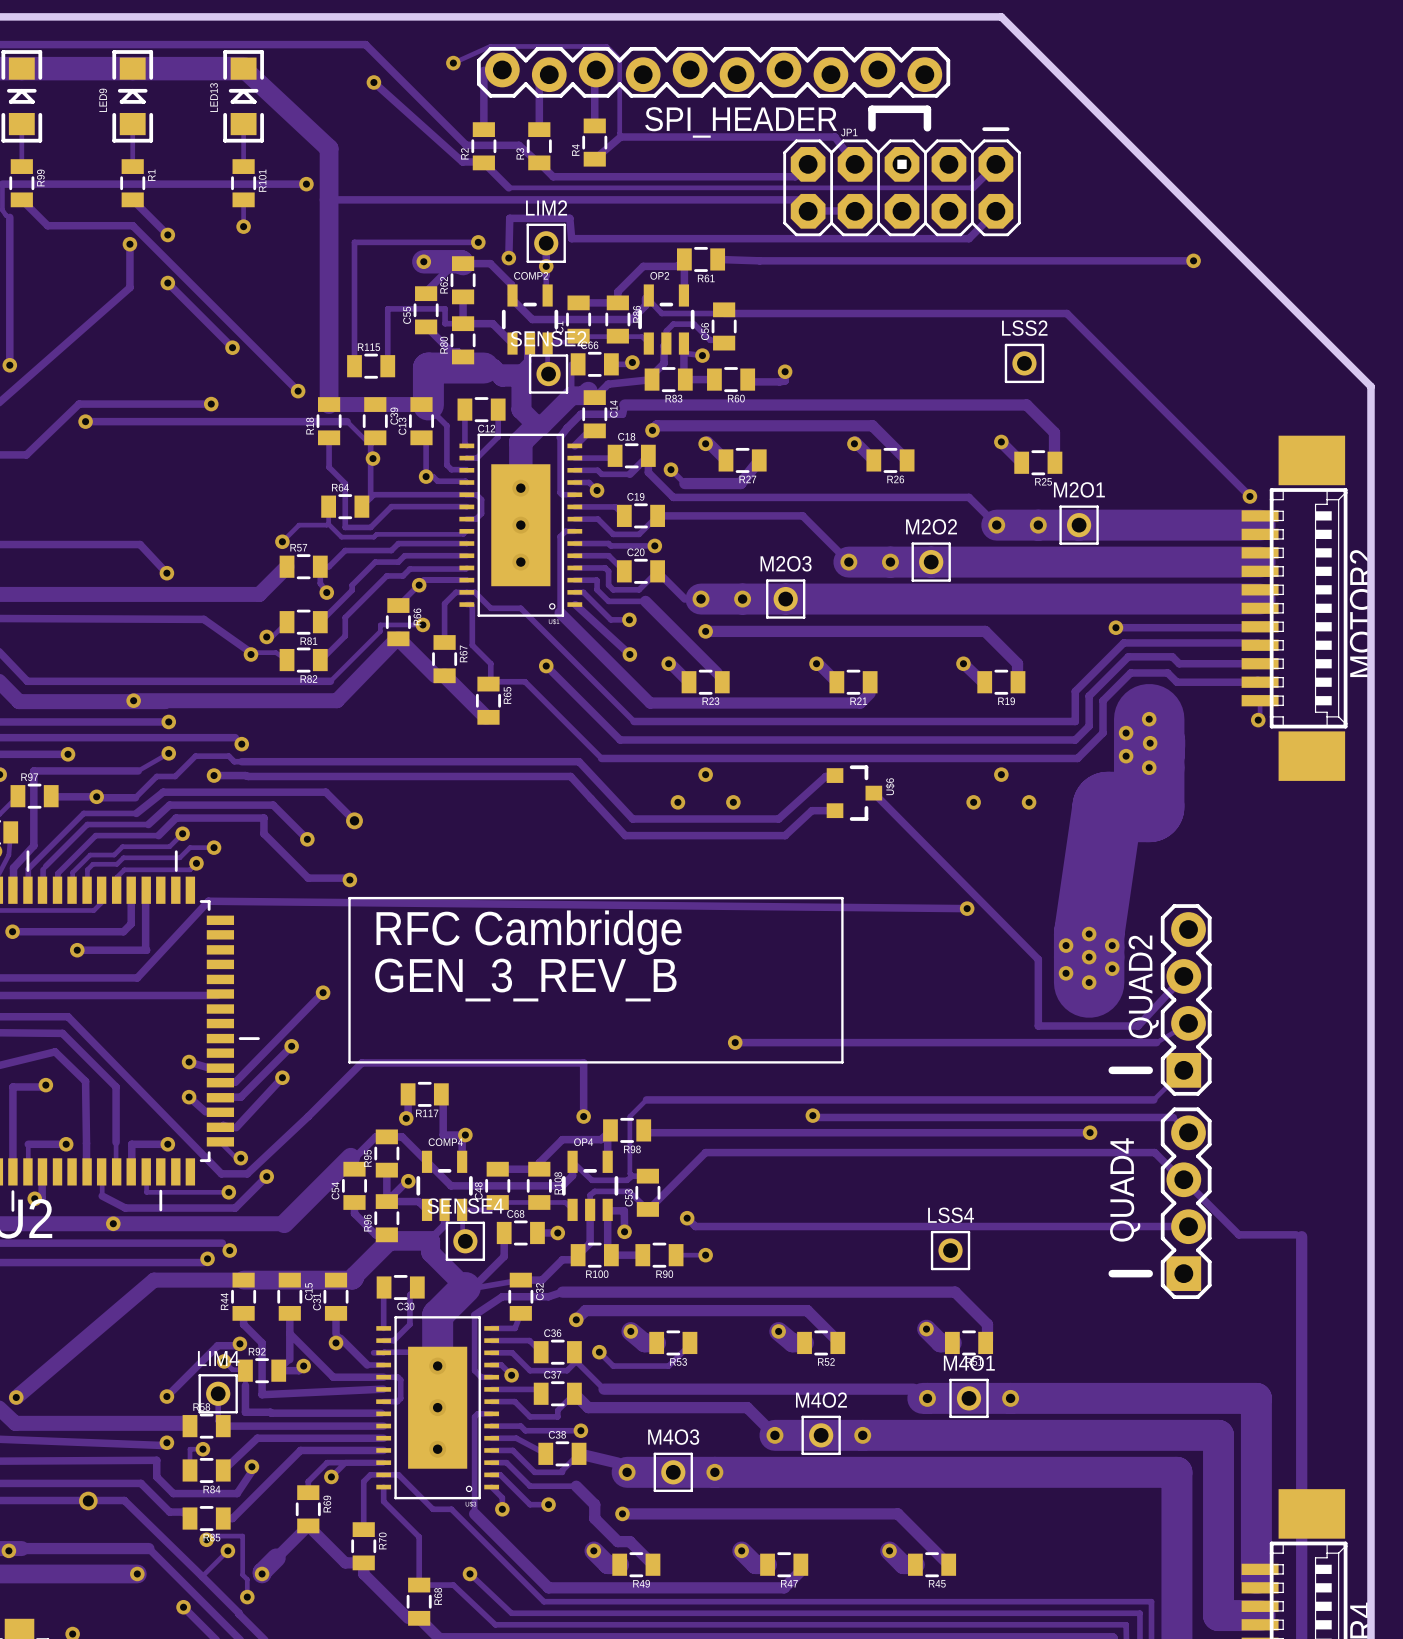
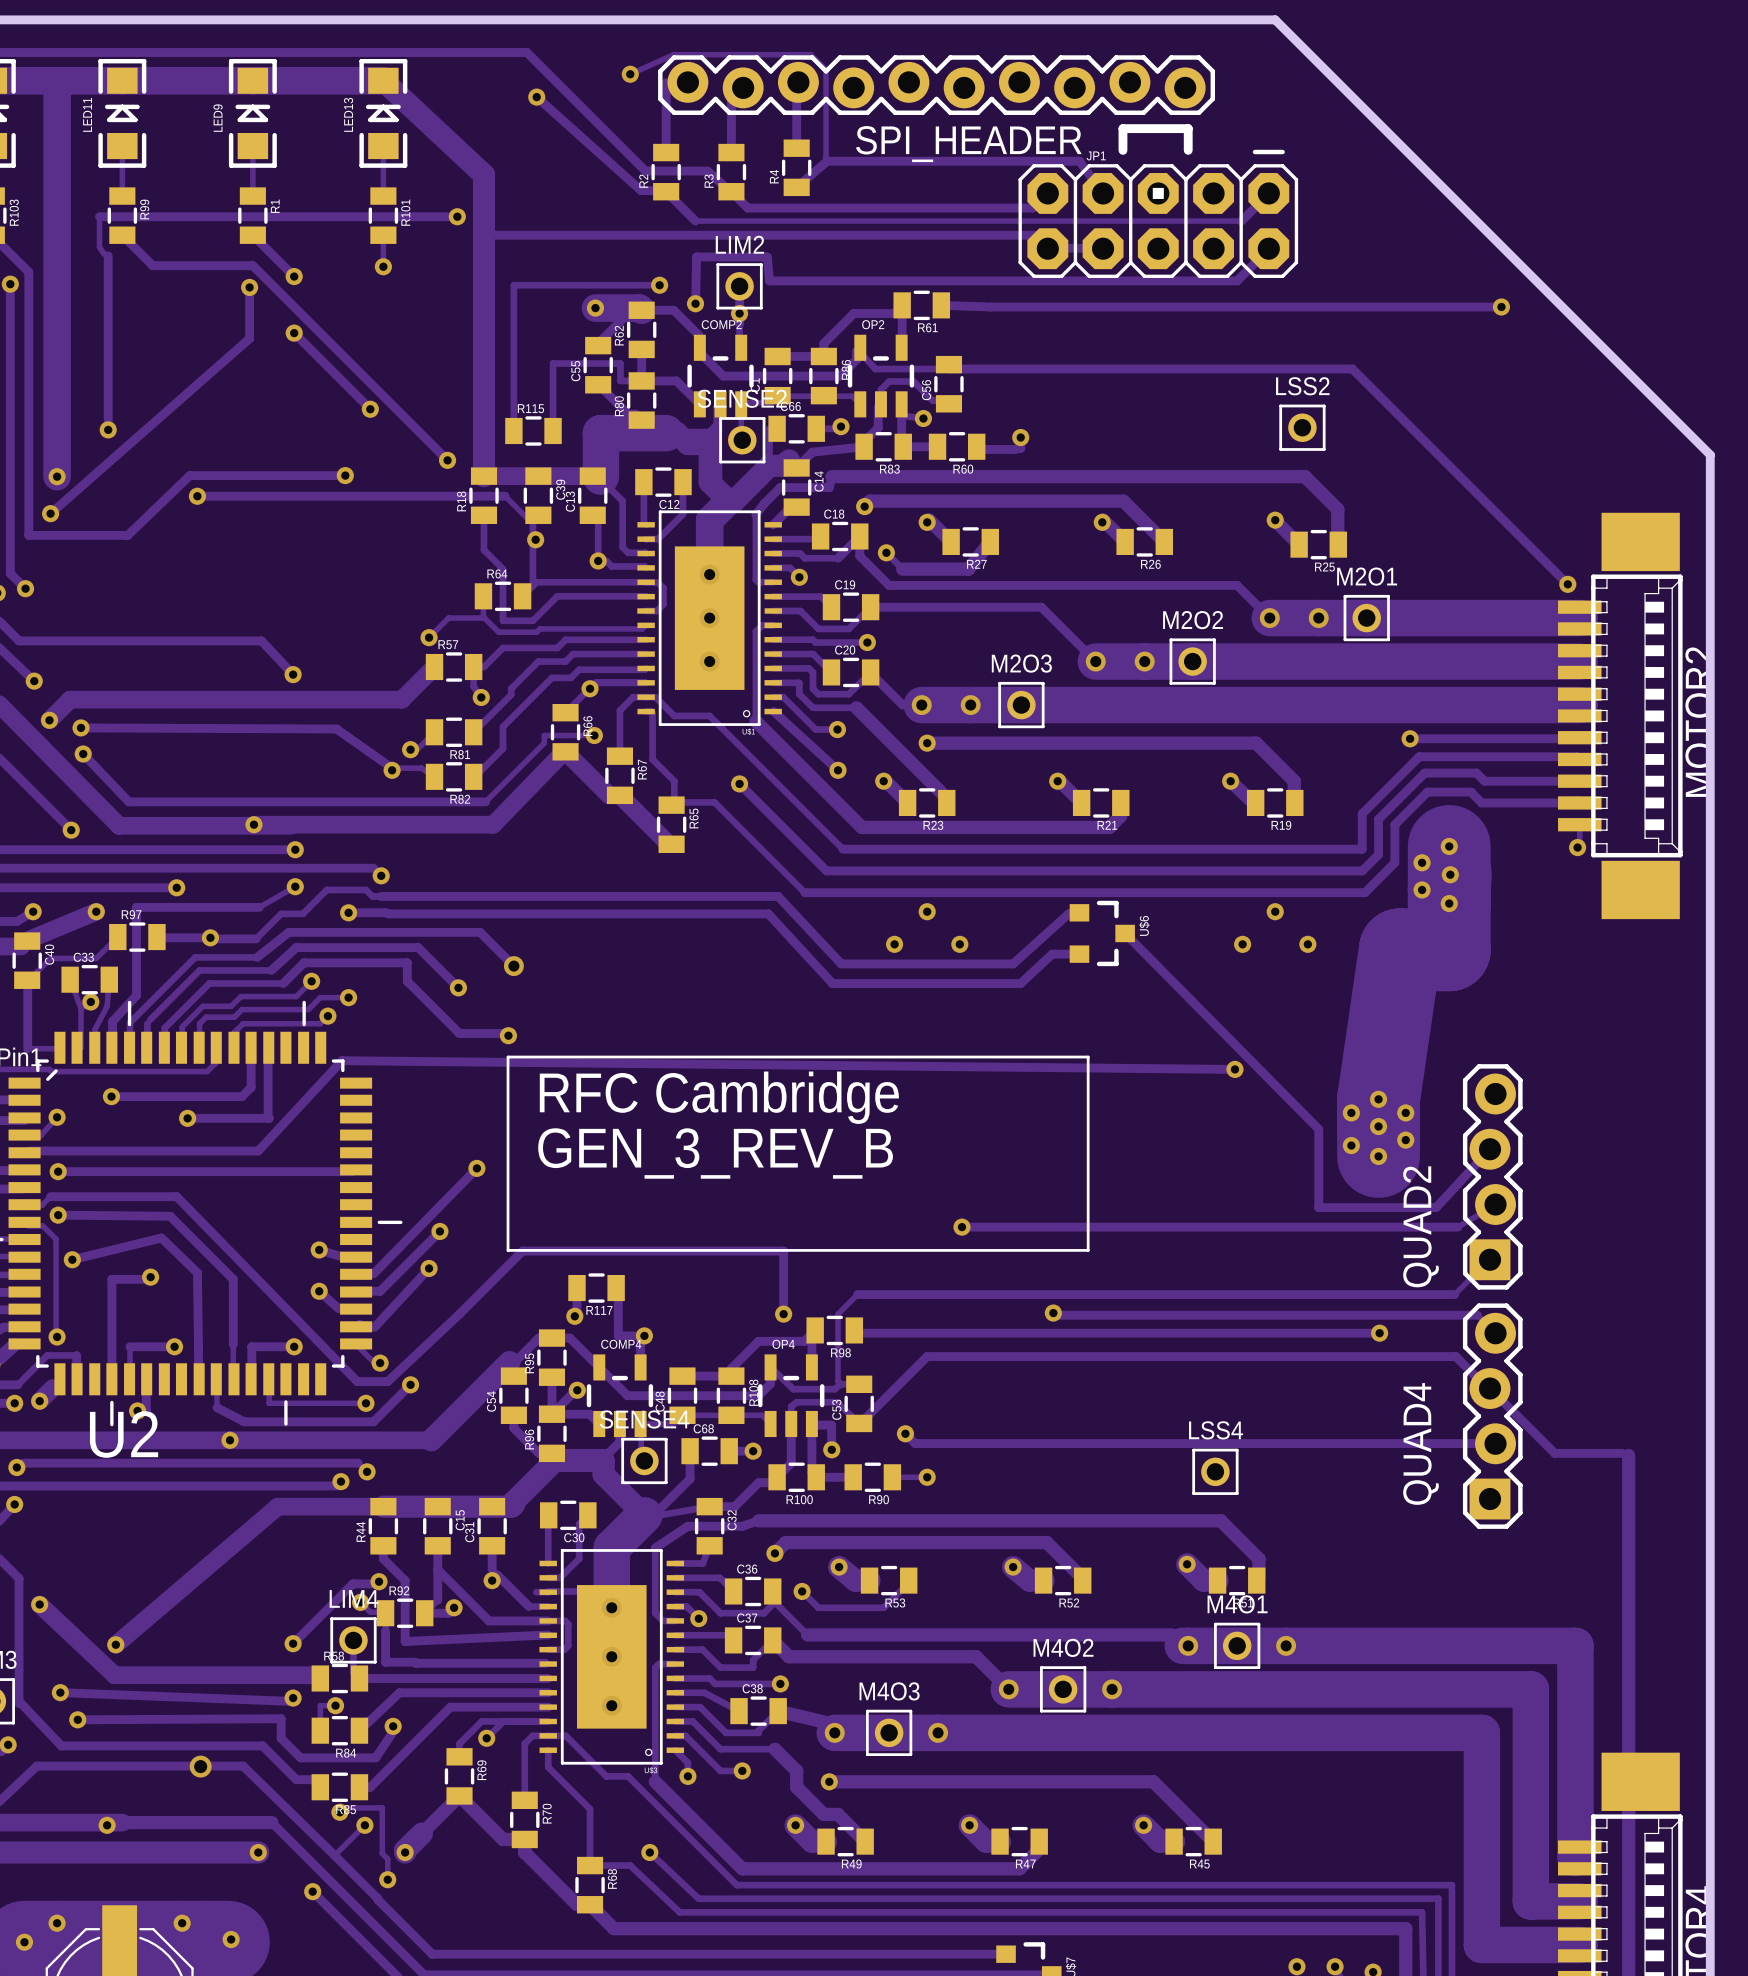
QUAD2 name position: QUAD2 (1143, 986) -> QUAD2 (1421, 1226)
line: (1112, 1070) (1149, 1070) -> none
QUAD4 name position: QUAD4 (1125, 1189) -> QUAD4 (1421, 1443)
line: (1112, 1273) (1149, 1273) -> none

